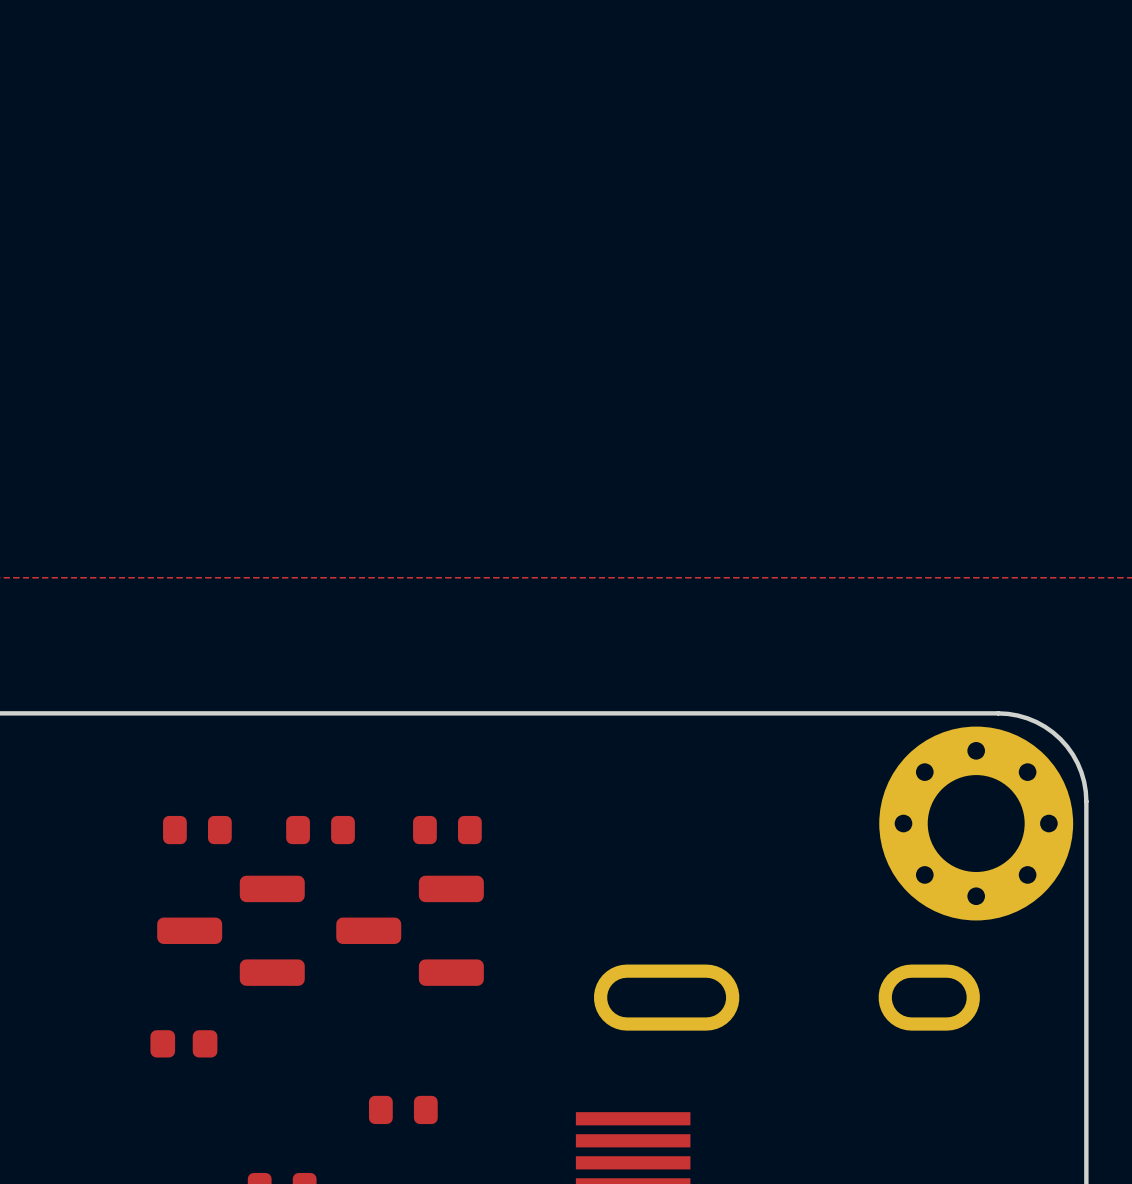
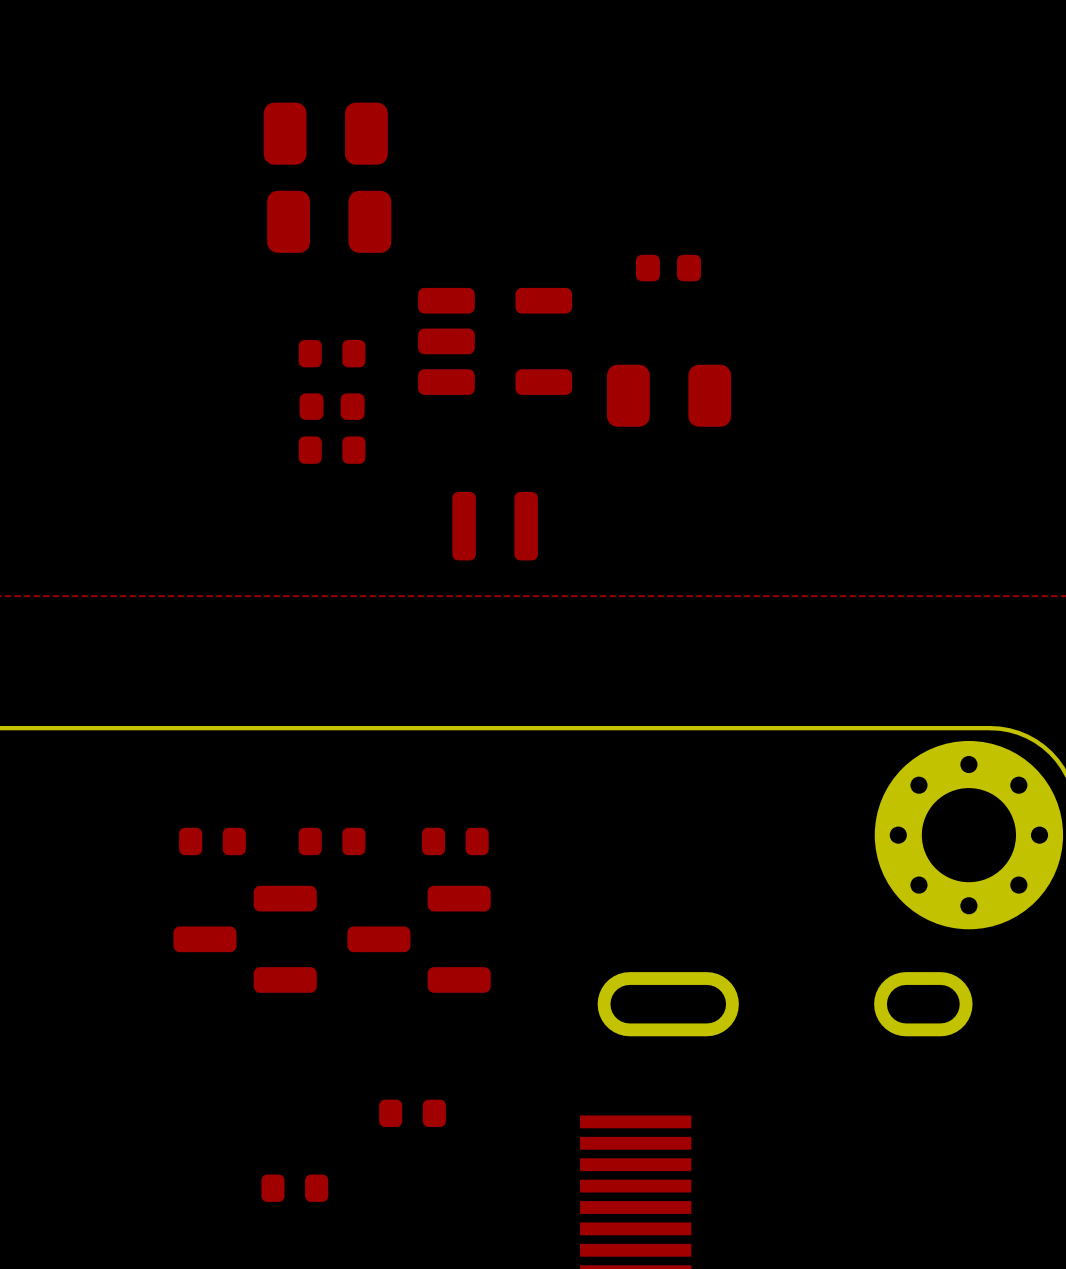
part: none -> (325, 133)
part: none -> (329, 221)
part: none -> (668, 268)
part: none -> (495, 341)
part: none -> (332, 353)
part: none -> (669, 395)
part: none -> (332, 406)
part: none -> (332, 450)
part: none -> (495, 526)
part: (183, 1043) -> none

